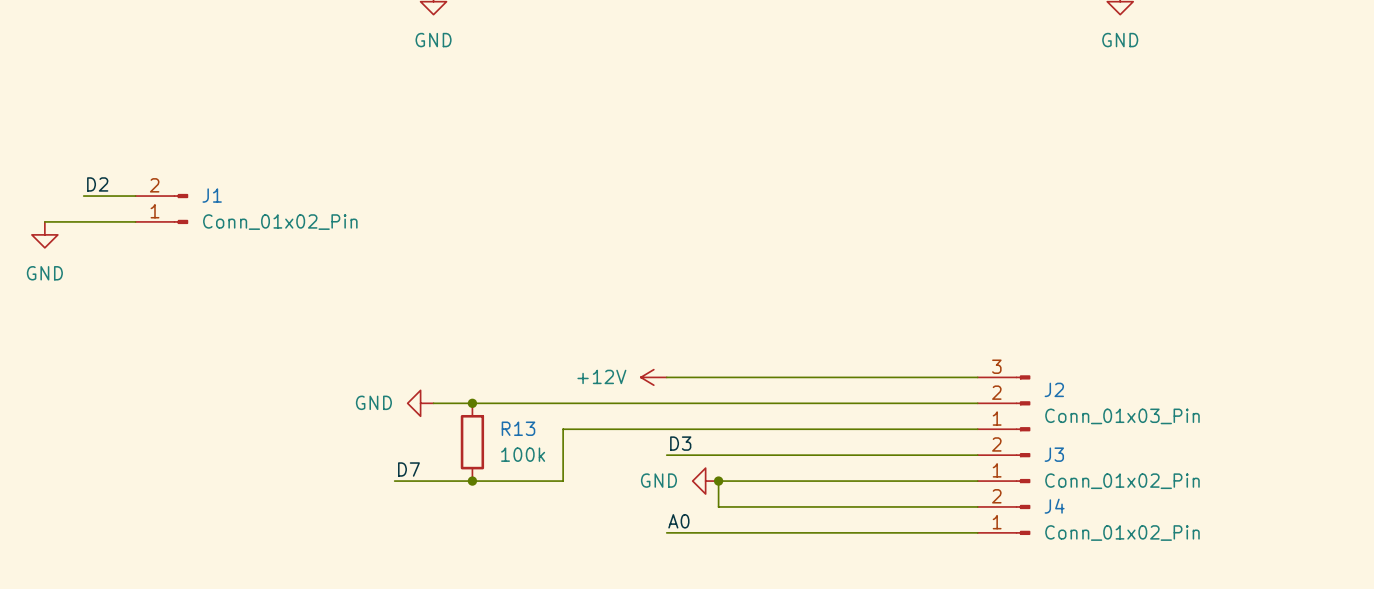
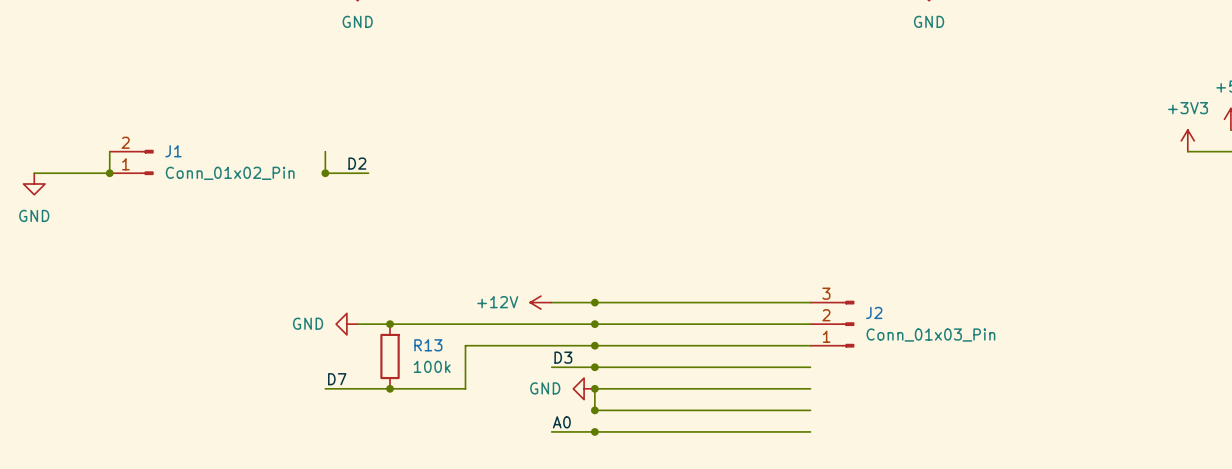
label: D2 (97, 184) -> none
wire: (83, 196) (135, 196) -> (109, 173) (109, 151)
wire: none -> (325, 151) (325, 173) (368, 173)
label: none -> D2 (357, 163)
junction: none -> (109, 173)
junction: none -> (325, 173)
junction: none -> (594, 302)
junction: none -> (594, 324)
junction: none -> (594, 345)
junction: none -> (594, 367)
J3: Conn_01x02_Pin (1004, 468) -> none
junction: none -> (594, 410)
J4: Conn_01x02_Pin (1004, 519) -> none
junction: none -> (594, 431)

